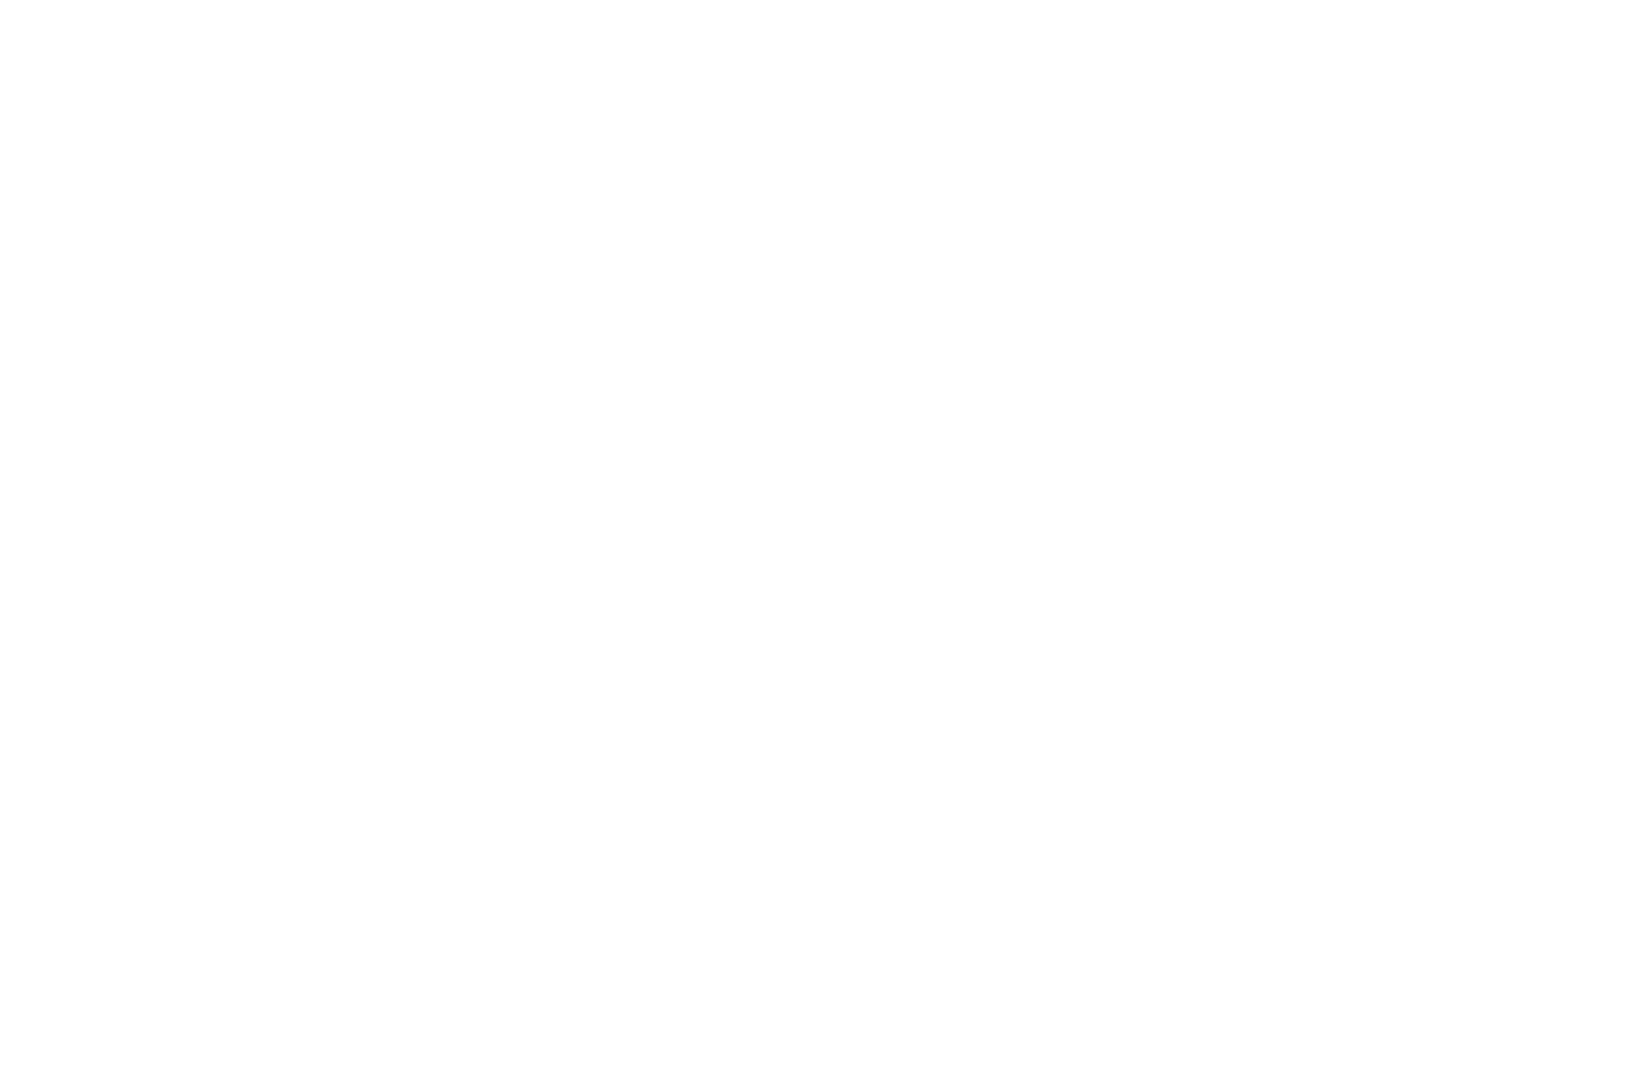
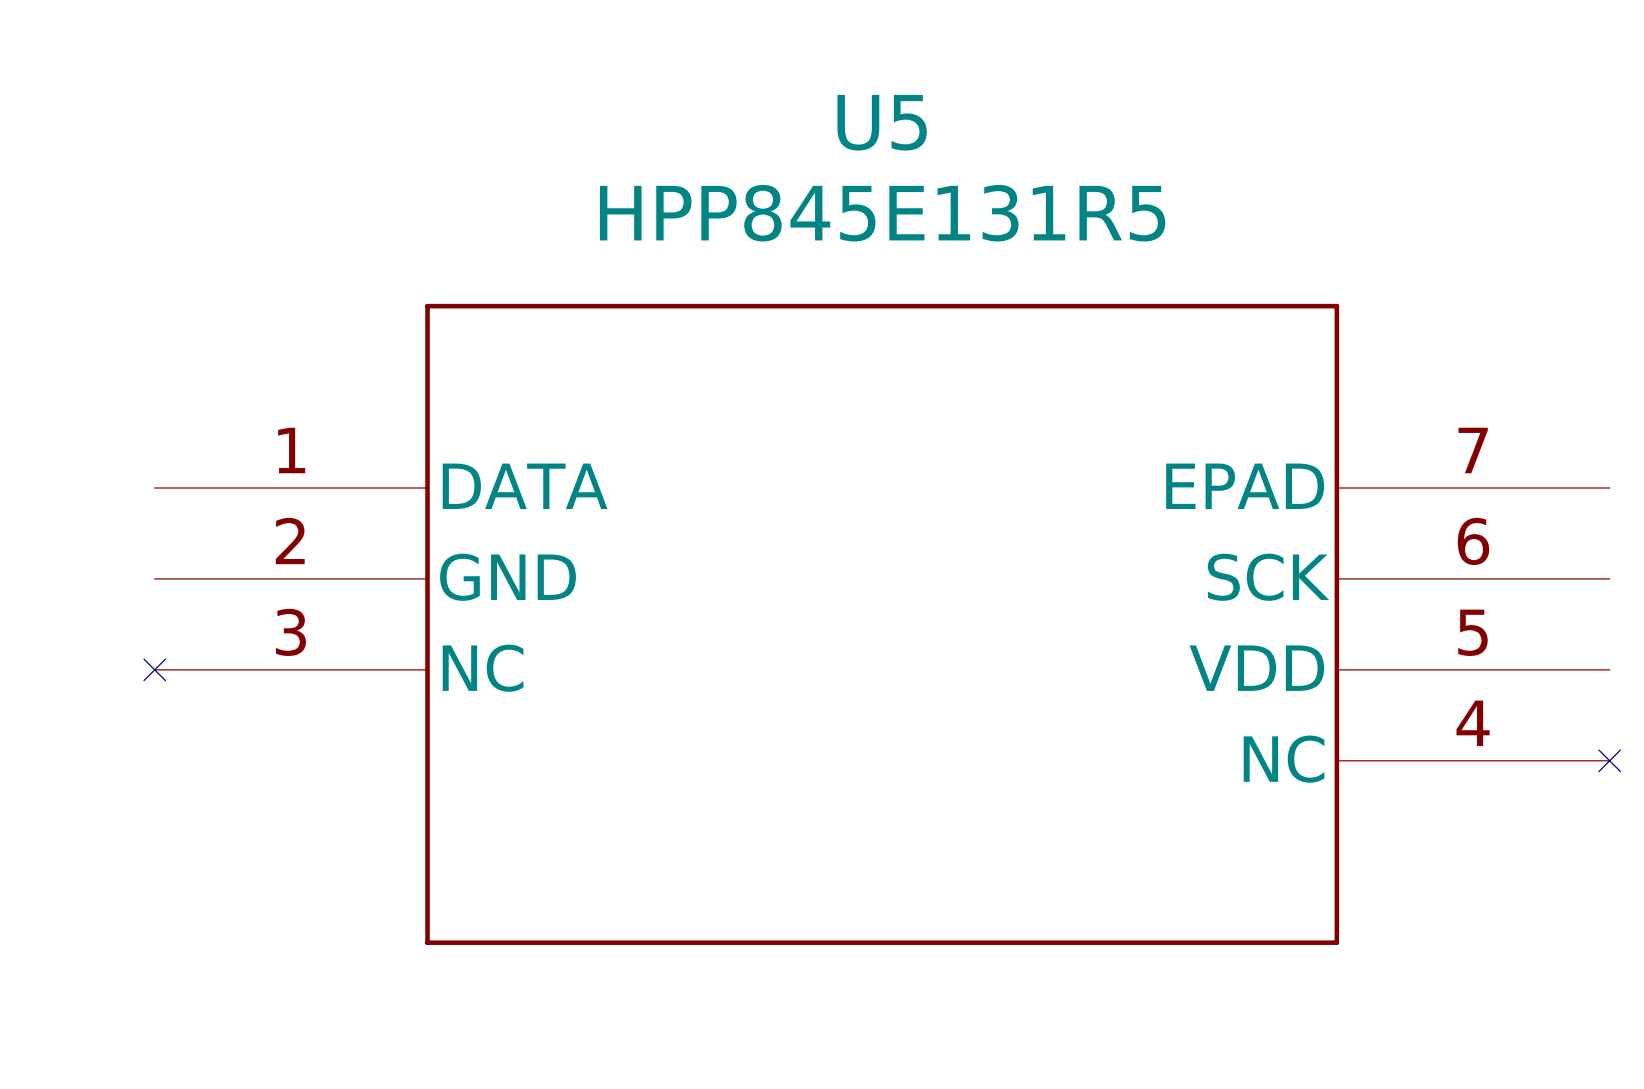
U5: none -> HPP845E131R5 (882, 624)

